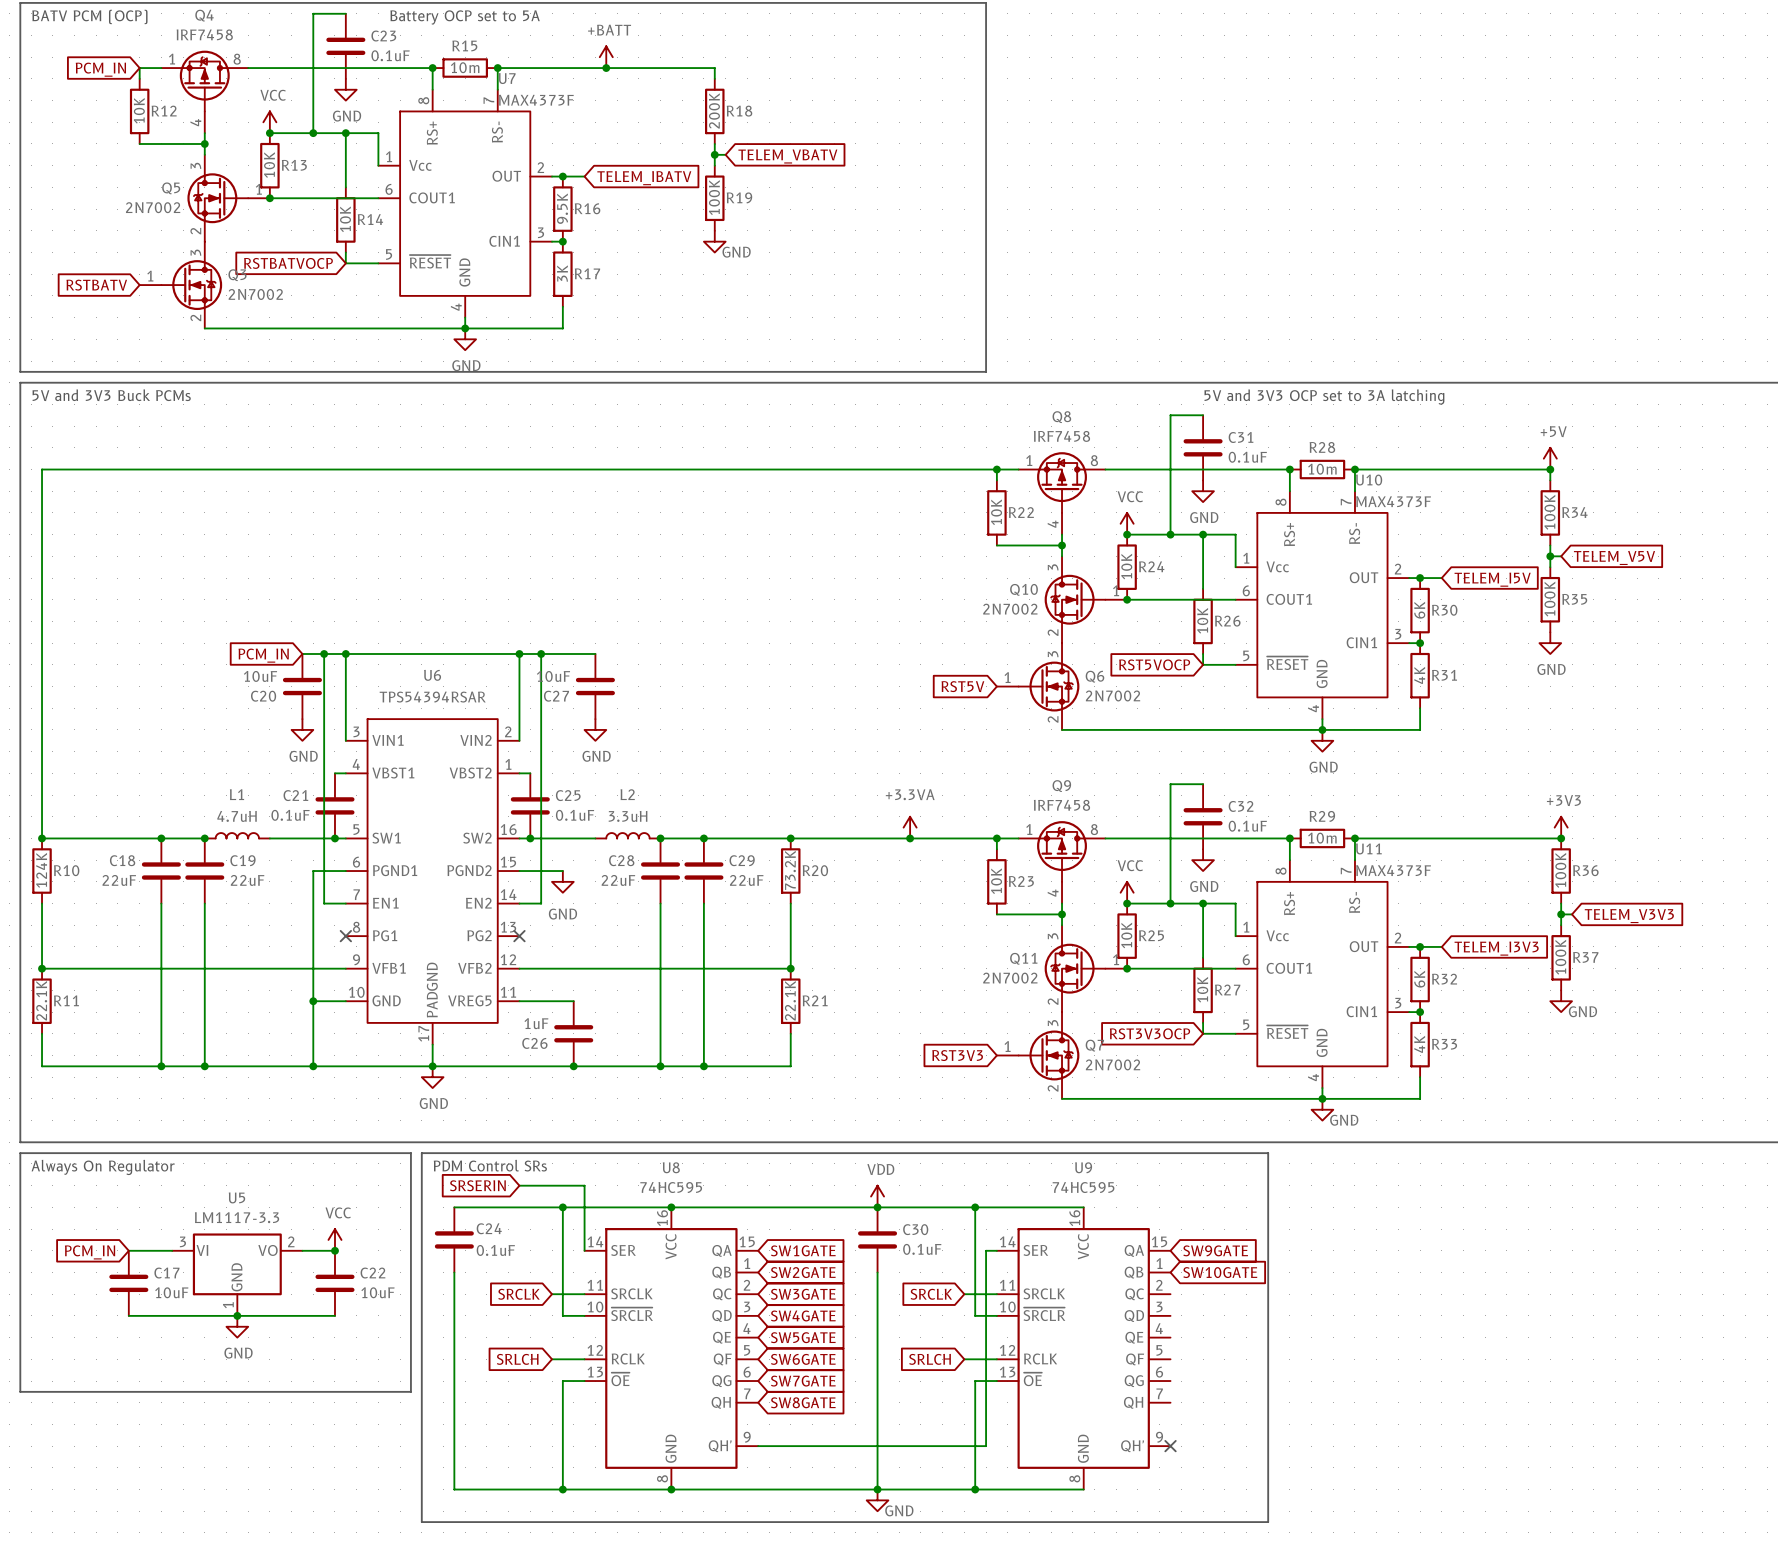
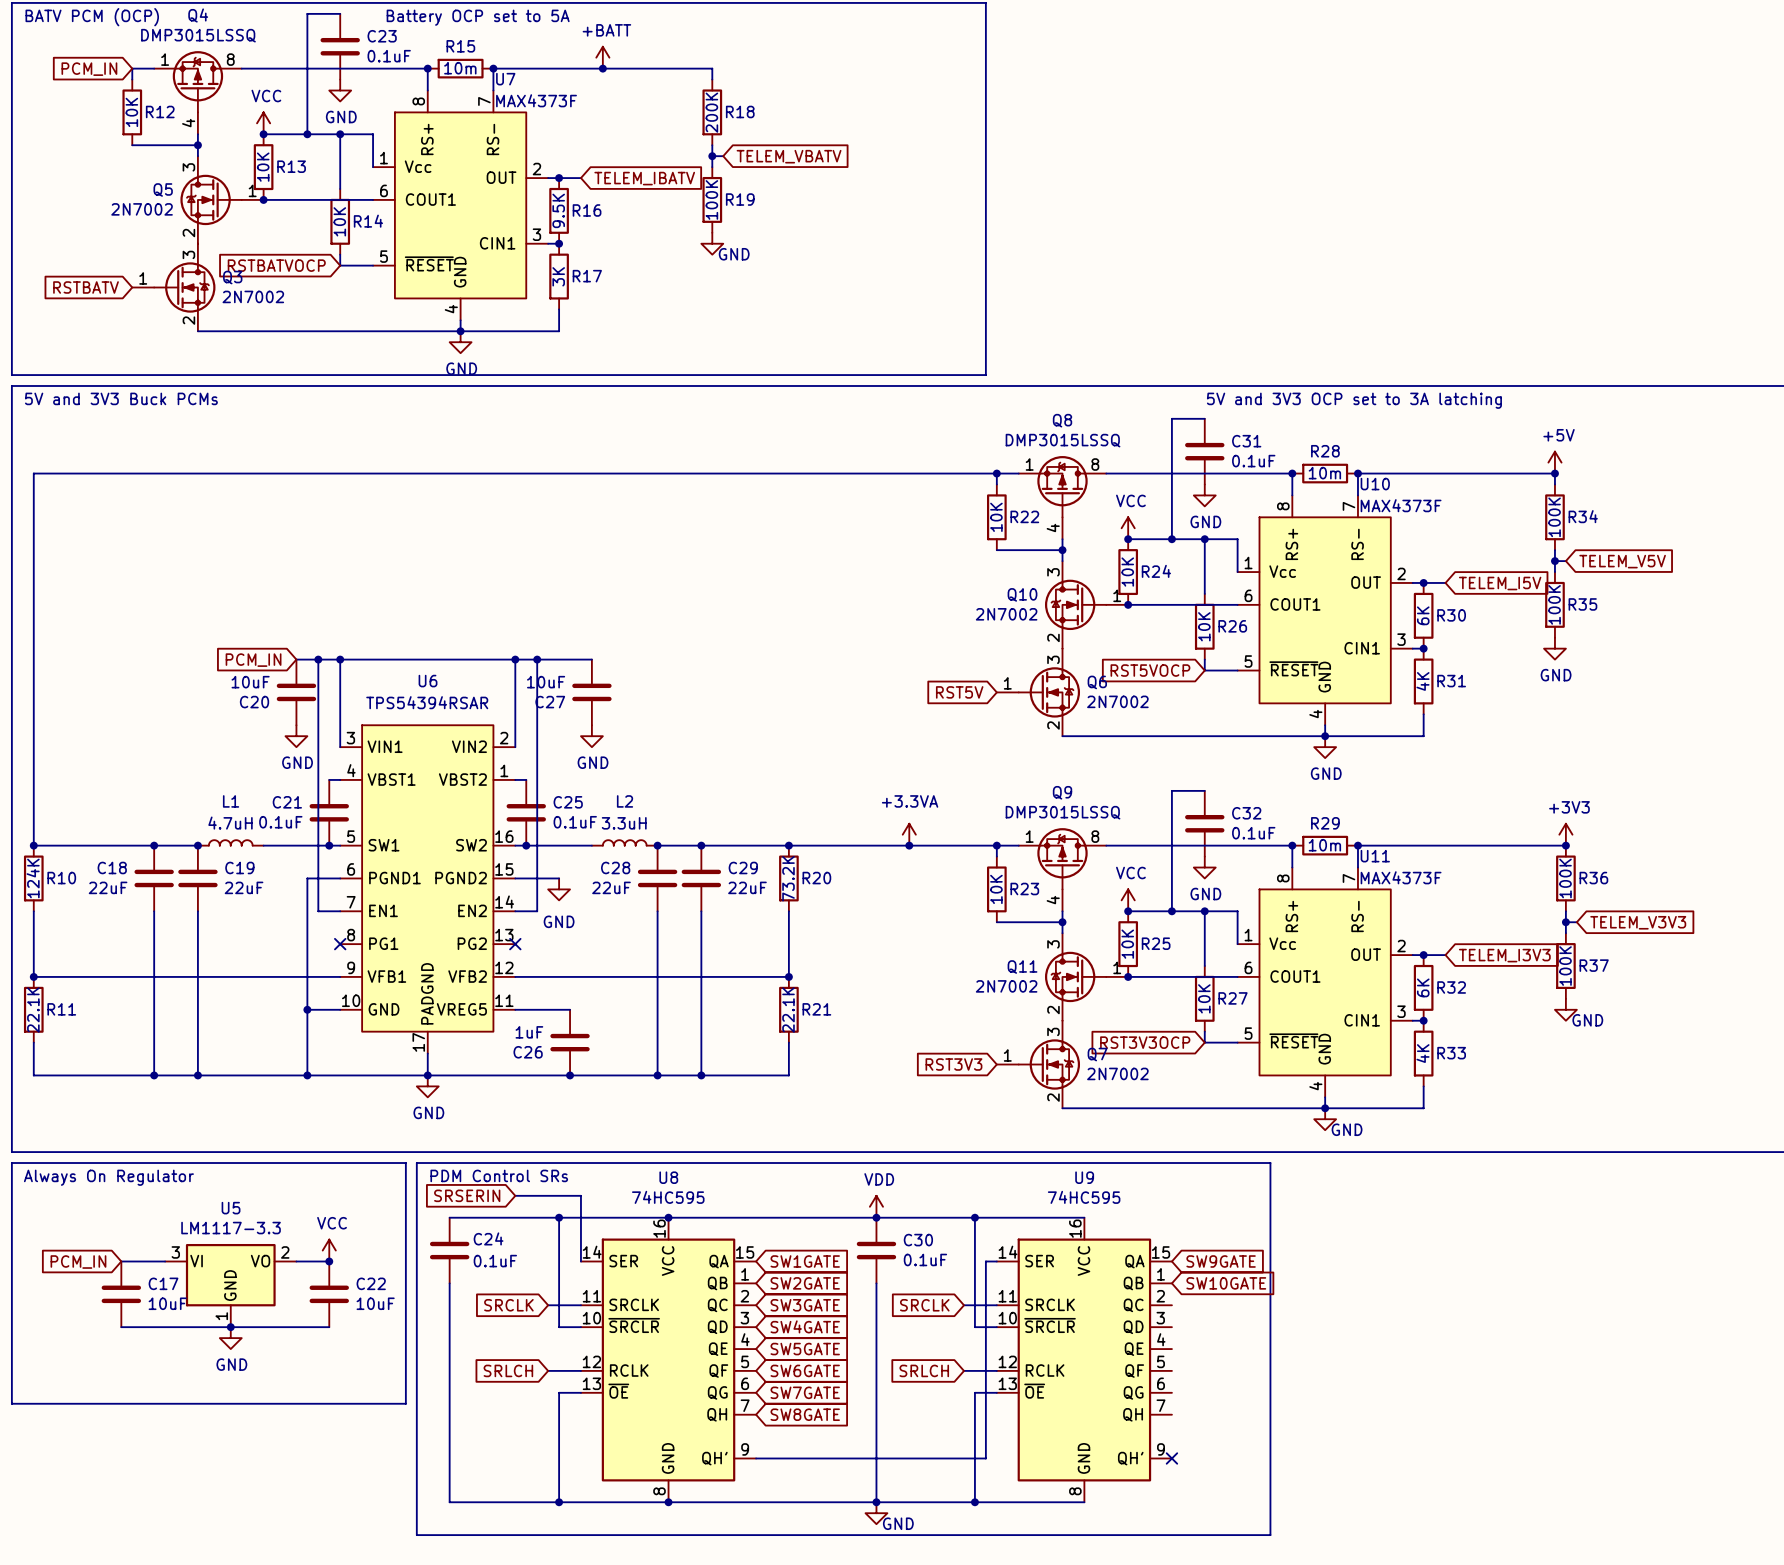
Q4 value: IRF7458 (204, 34) -> DMP3015LSSQ (198, 35)
Q8 value: IRF7458 (1061, 436) -> DMP3015LSSQ (1063, 440)
Q9 value: IRF7458 (1061, 805) -> DMP3015LSSQ (1063, 812)

